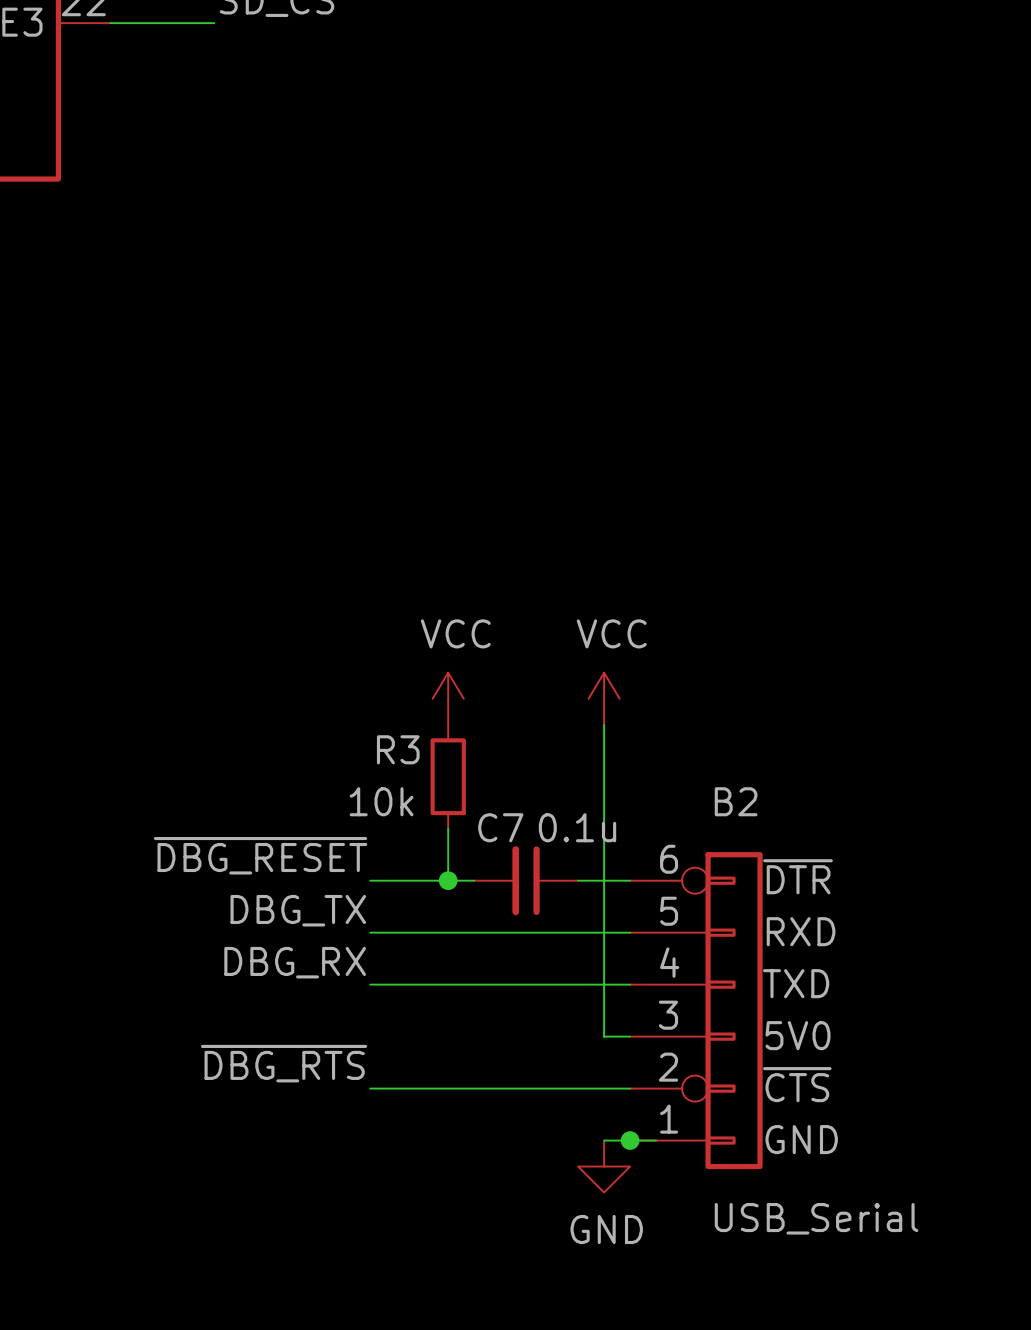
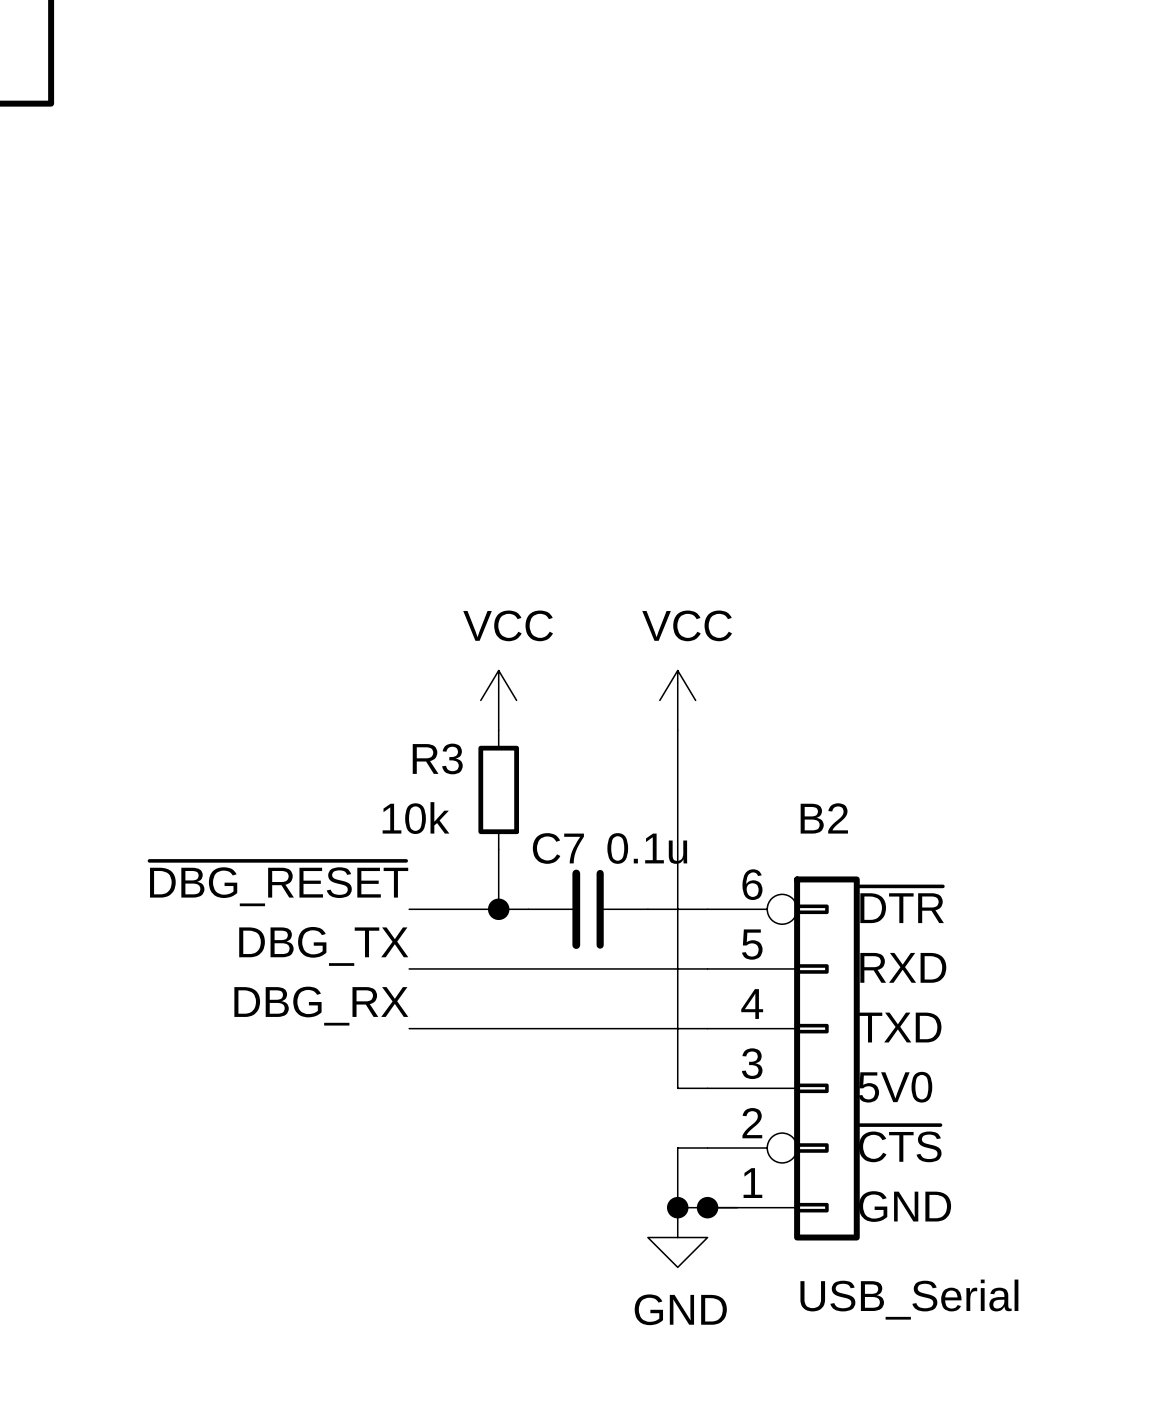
label: ~{DBG_RTS} (284, 1063) -> none
wire: (370, 1088) (604, 1088) -> (677, 1207) (677, 1148)
junction: none -> (677, 1207)

